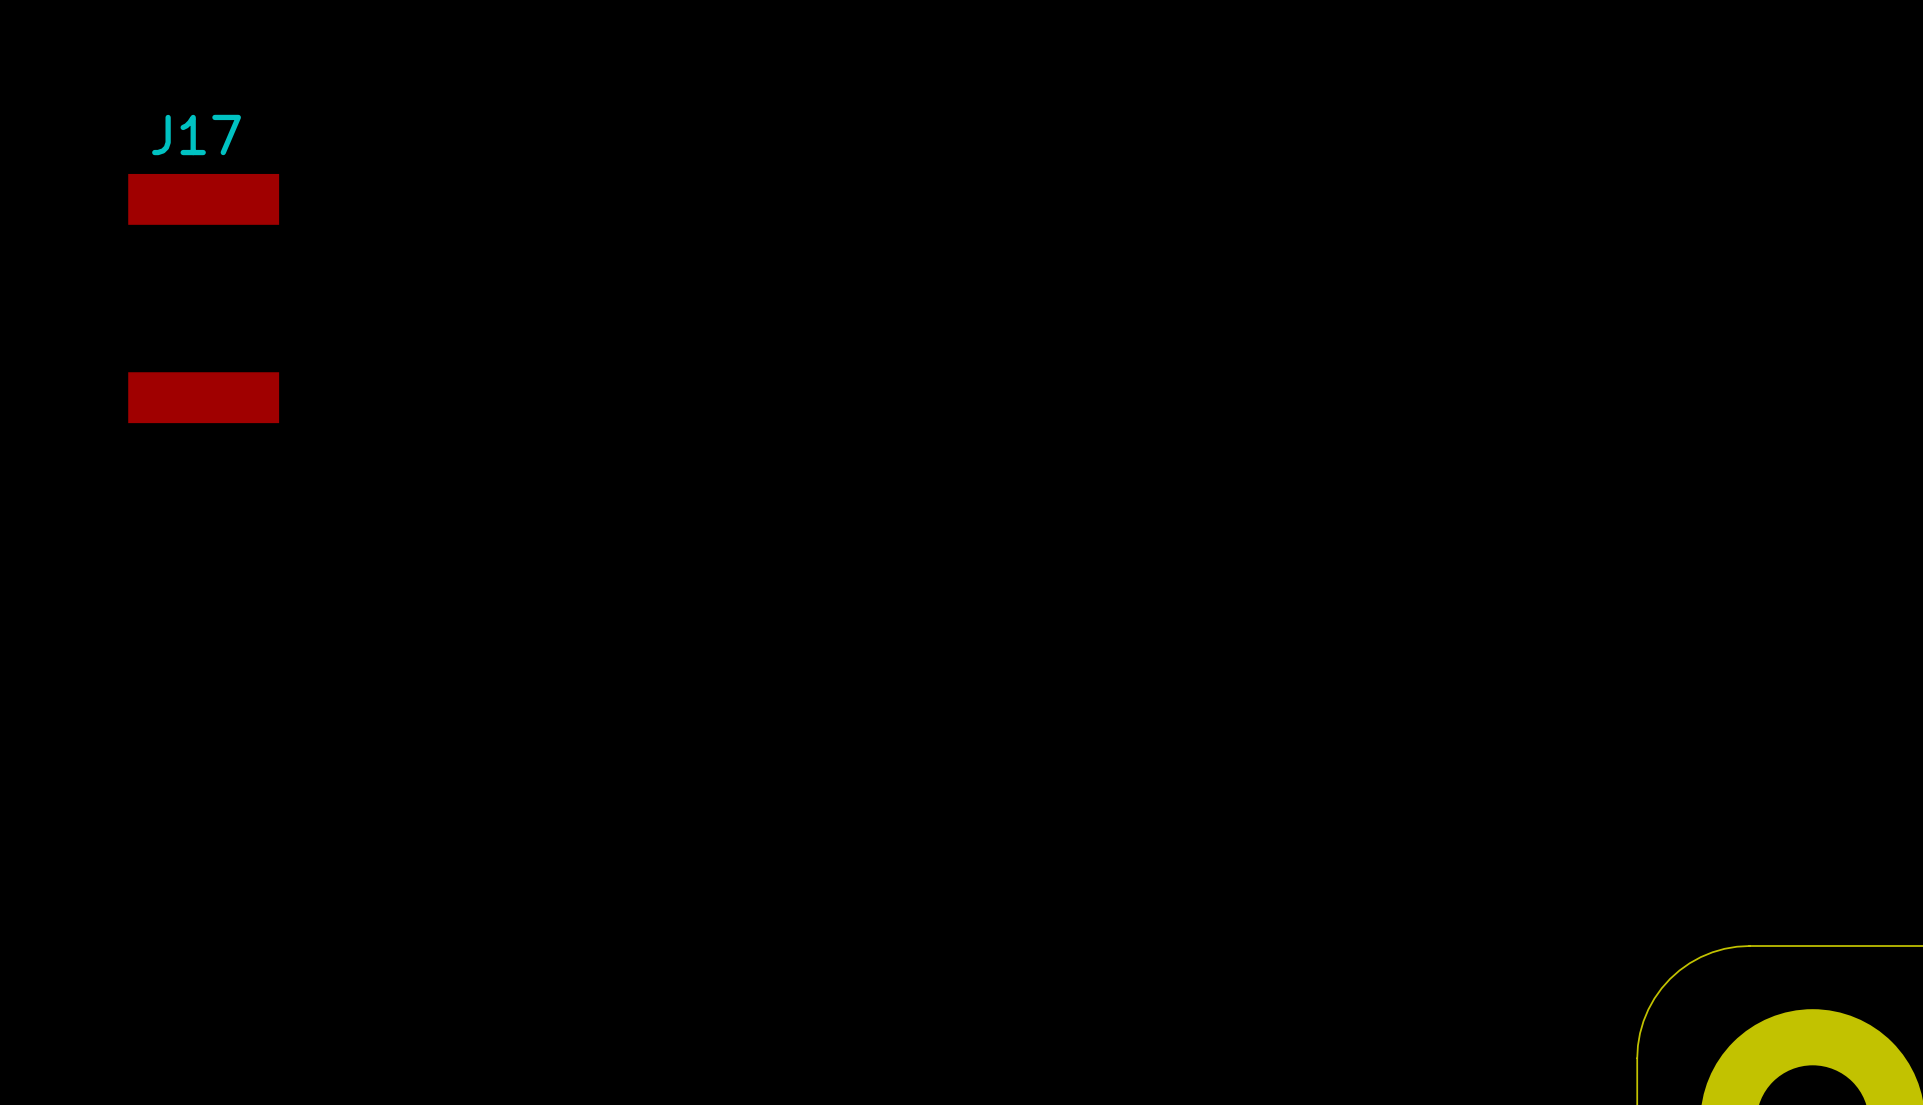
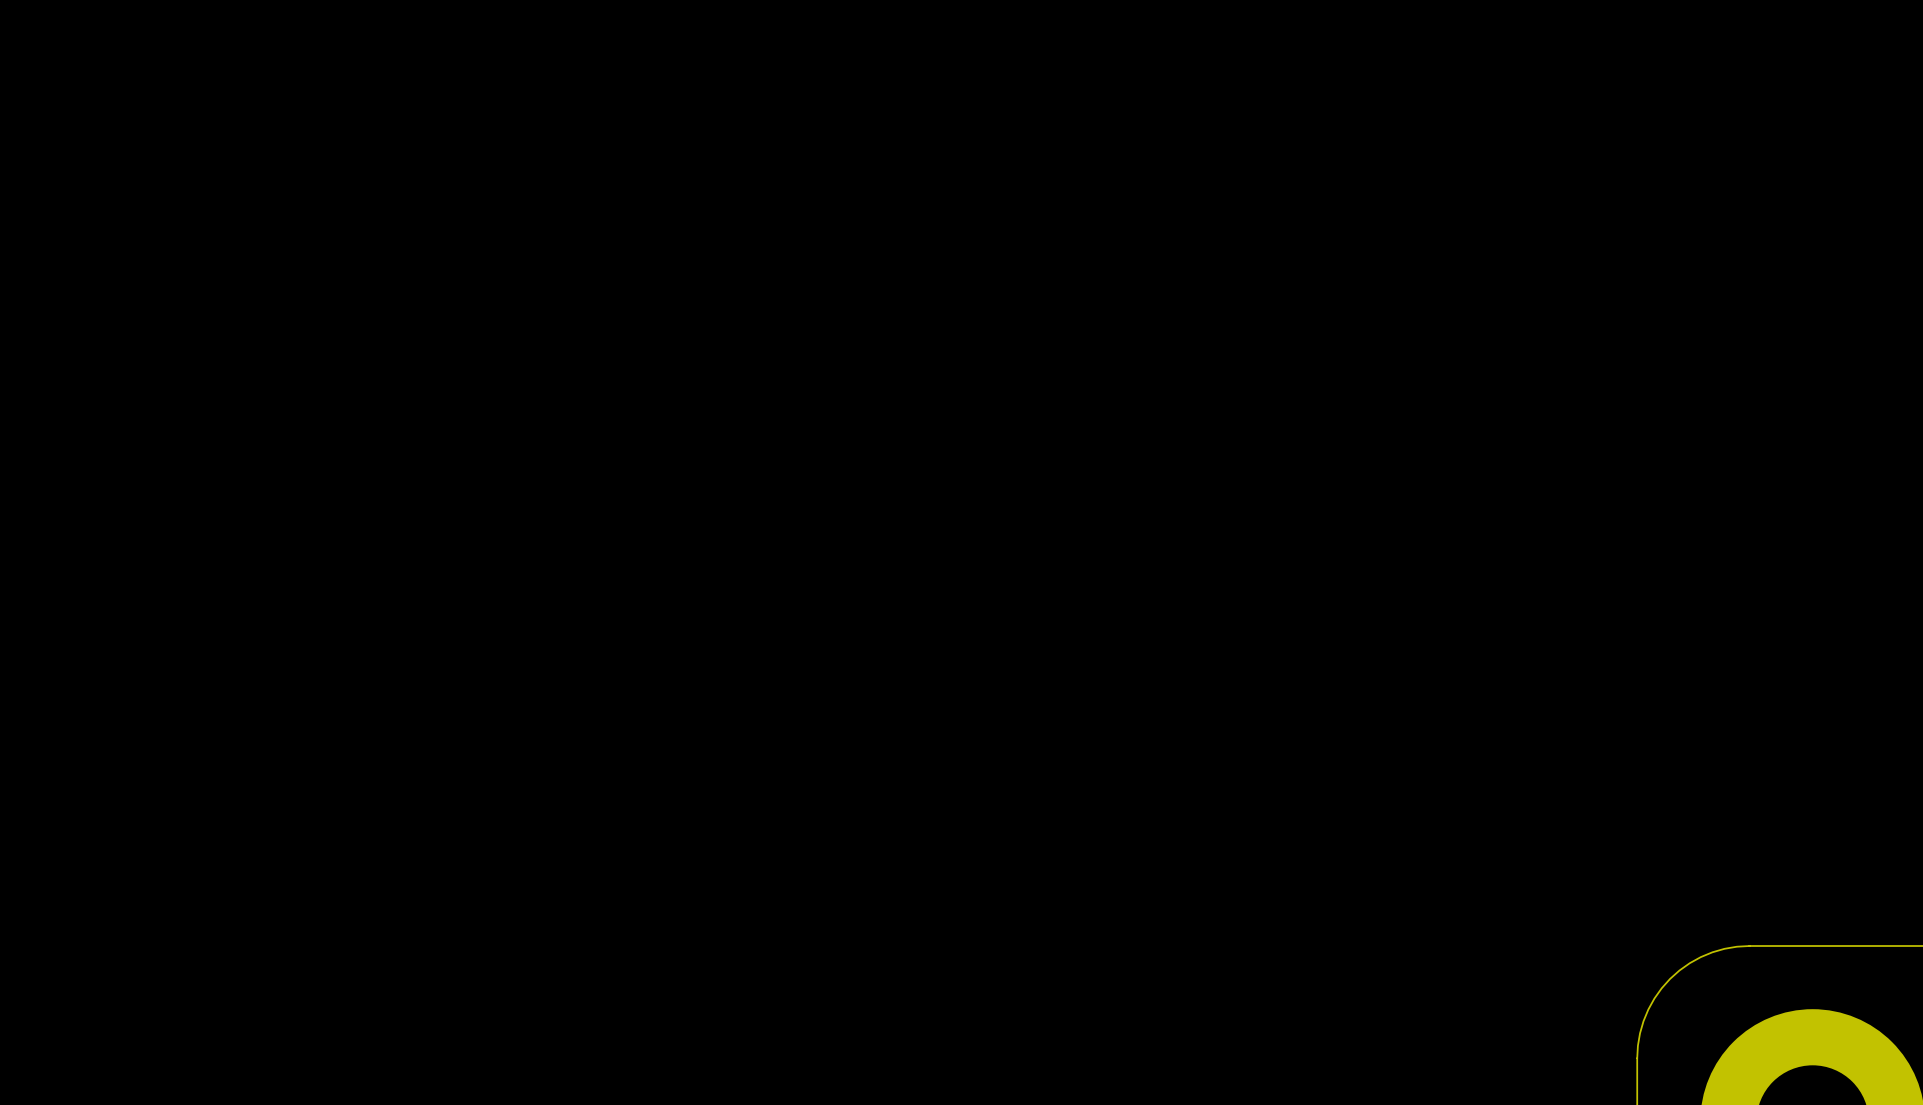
J17: (203, 298) -> none

